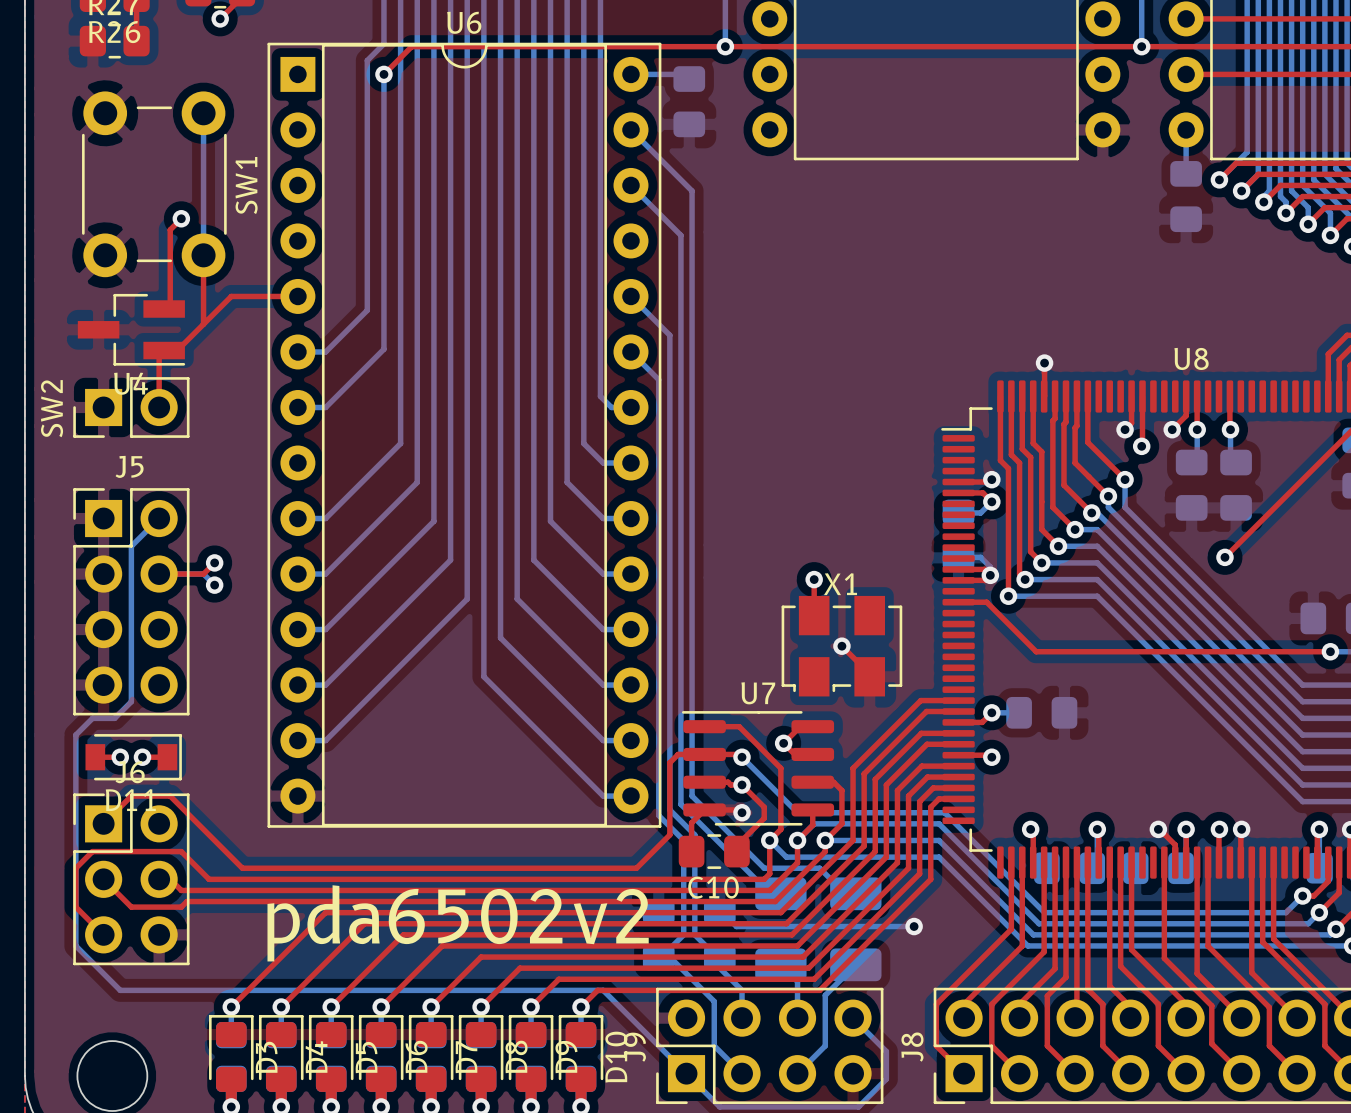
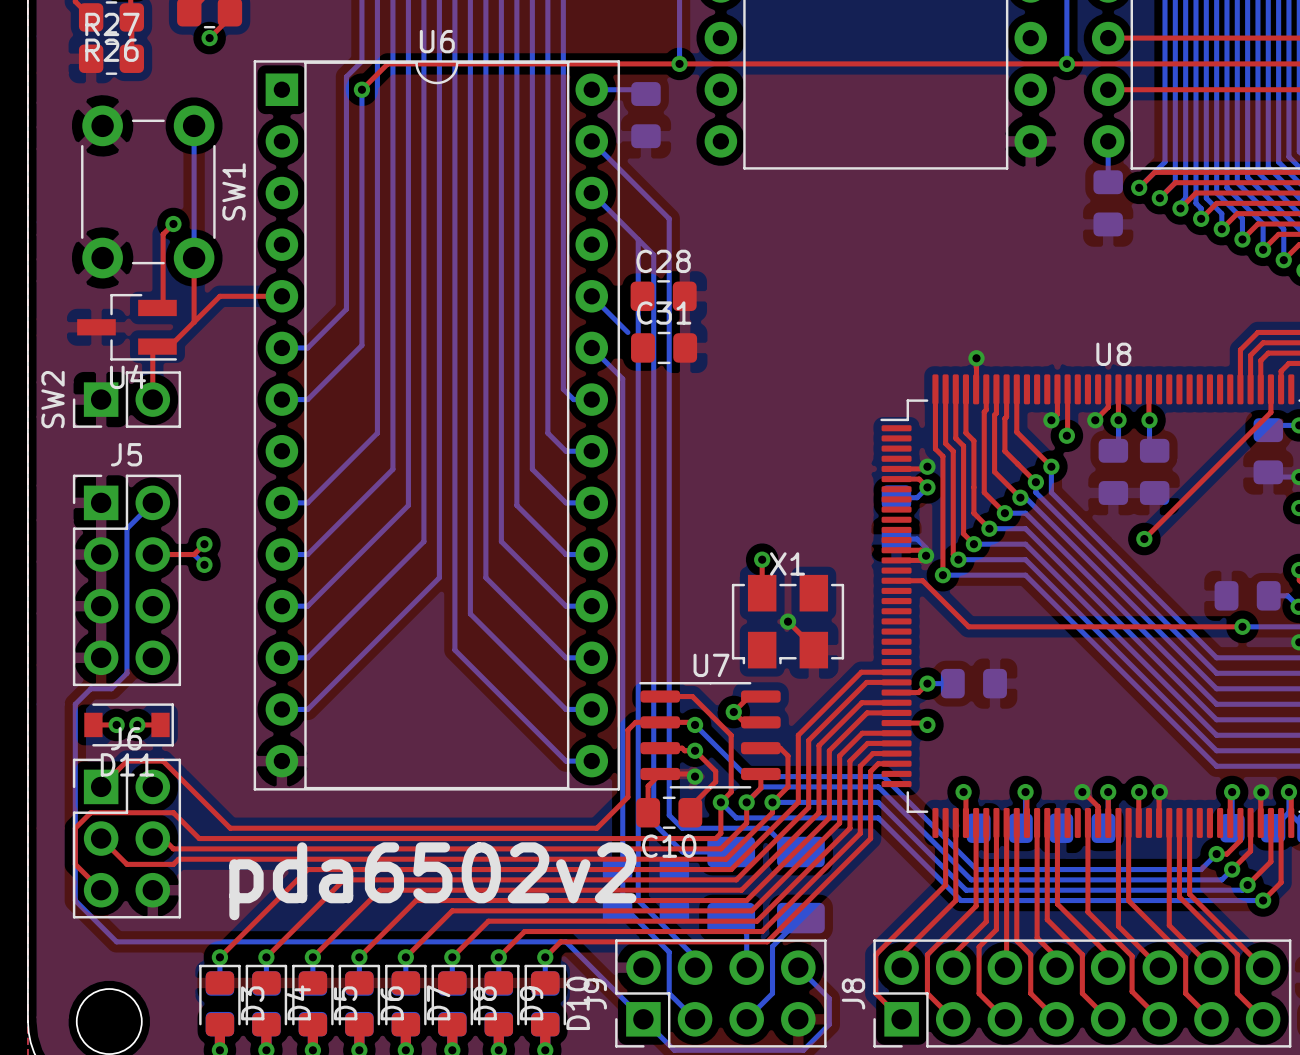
bottom track: (692, 190) (692, 796) (764, 868) -> (648, 198) (669, 218) (669, 815) (682, 828) (715, 828)
bottom track: none -> (638, 239) (653, 254) (653, 823) (682, 852) (721, 852)
C28: none -> (663, 296)
bottom track: (669, 335) (669, 809) (694, 834) (694, 934) (717, 957) (719, 957) (719, 968) (742, 990) (742, 1007) -> none
C31: none -> (664, 347)
bottom track: (658, 379) (658, 815) (683, 840) (683, 934) (661, 957) -> (617, 373) (622, 378) (622, 905) (628, 911)
bottom track: (680, 804) (770, 893) -> (638, 768) (638, 900) (695, 957)
bottom track: (719, 912) (722, 912) (736, 926) (914, 926) -> none
via: (914, 926) -> none

